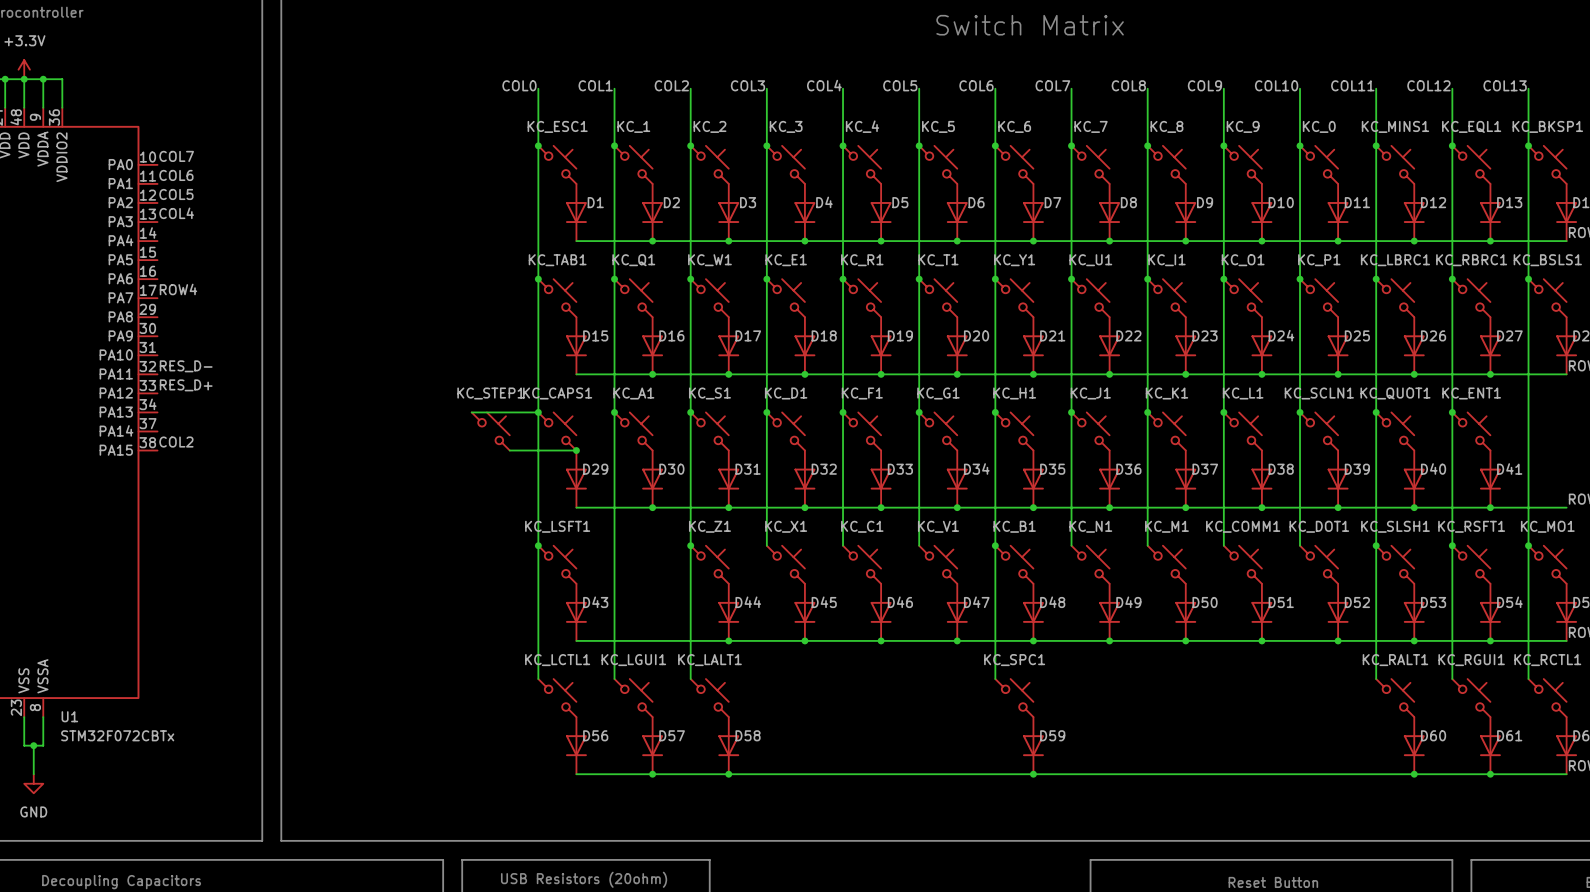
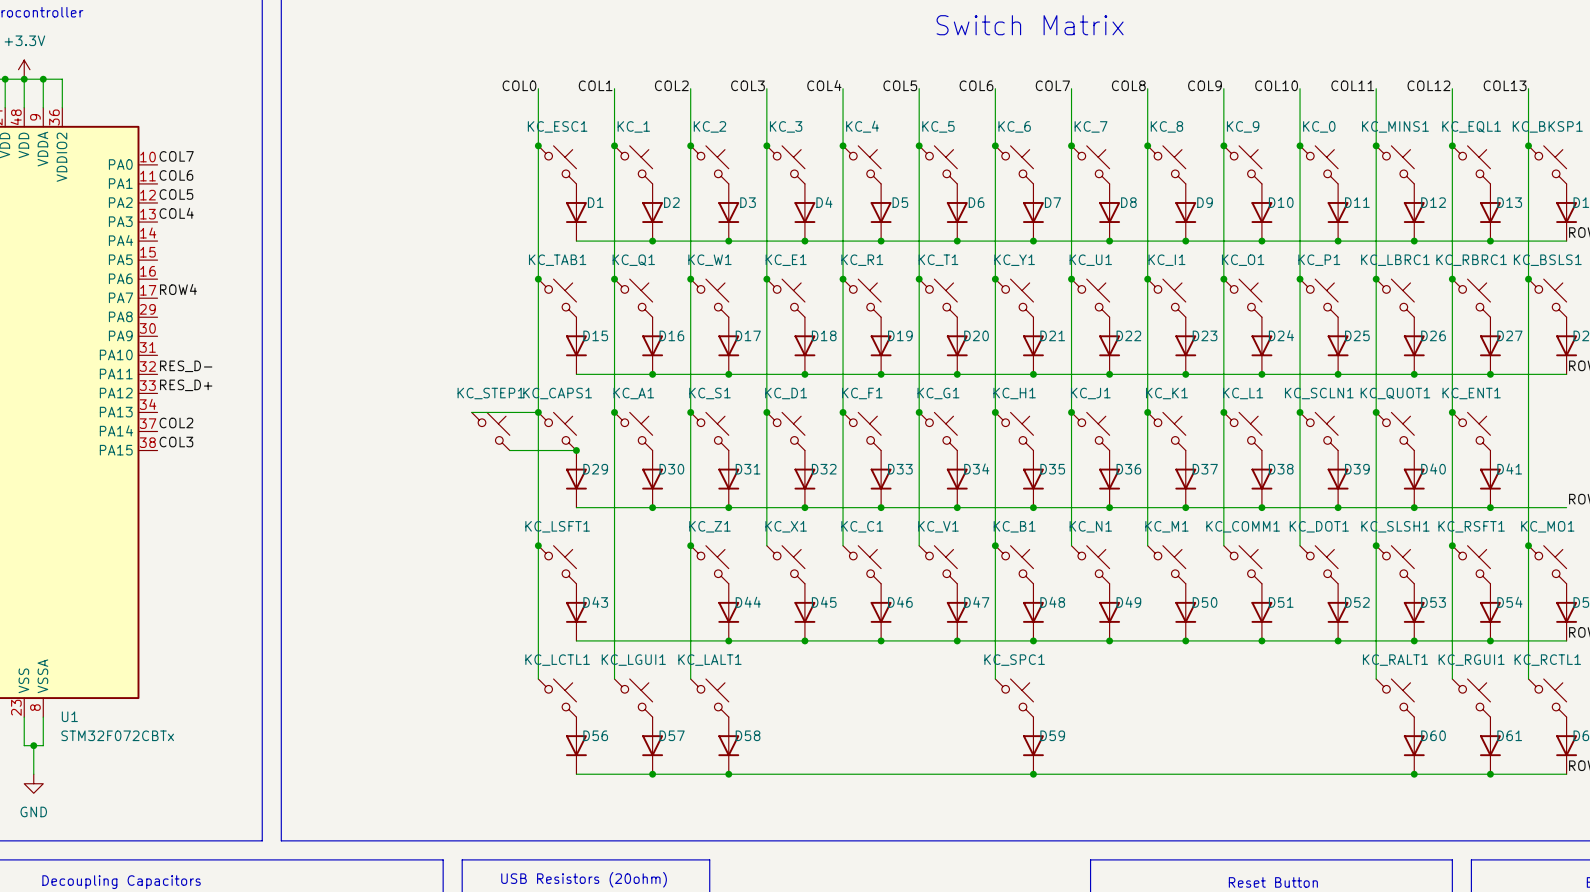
label: none -> COL2 (176, 422)
label: COL2 (176, 442) -> COL3 (176, 442)

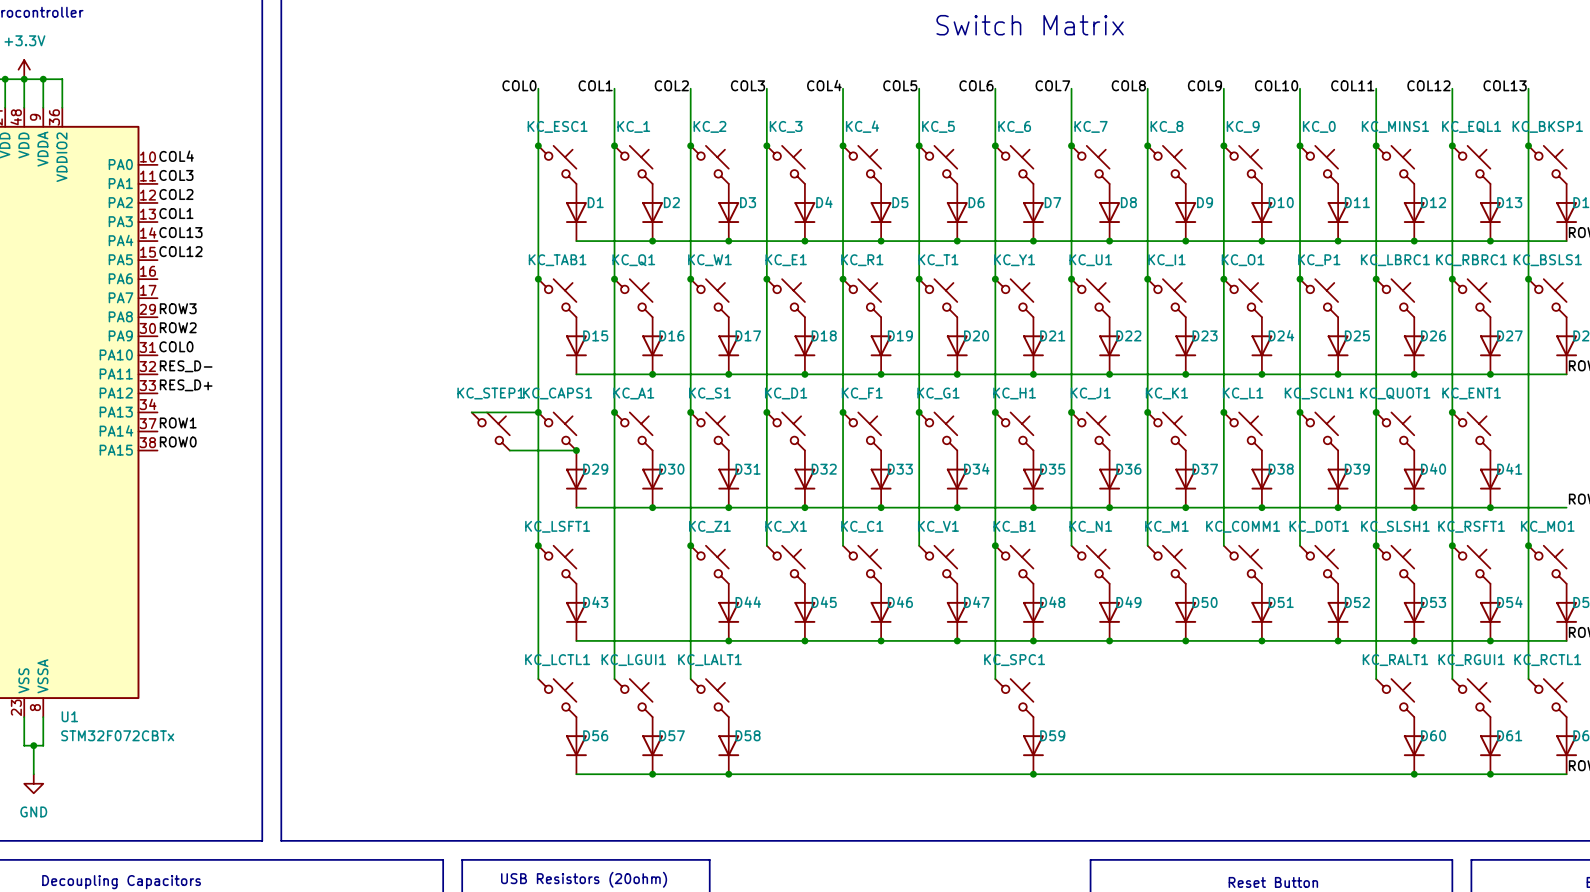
label: COL7 (176, 156) -> COL4 (176, 156)
label: COL6 (176, 175) -> COL3 (176, 175)
label: COL5 (176, 194) -> COL2 (176, 194)
label: COL4 (176, 213) -> COL1 (176, 213)
label: none -> COL13 (180, 232)
label: none -> COL12 (180, 251)
label: ROW4 (178, 289) -> ROW3 (178, 308)
label: none -> ROW2 (178, 327)
label: none -> COL0 (176, 346)
label: COL2 (176, 422) -> ROW1 (178, 422)
label: COL3 (176, 442) -> ROW0 (178, 442)

